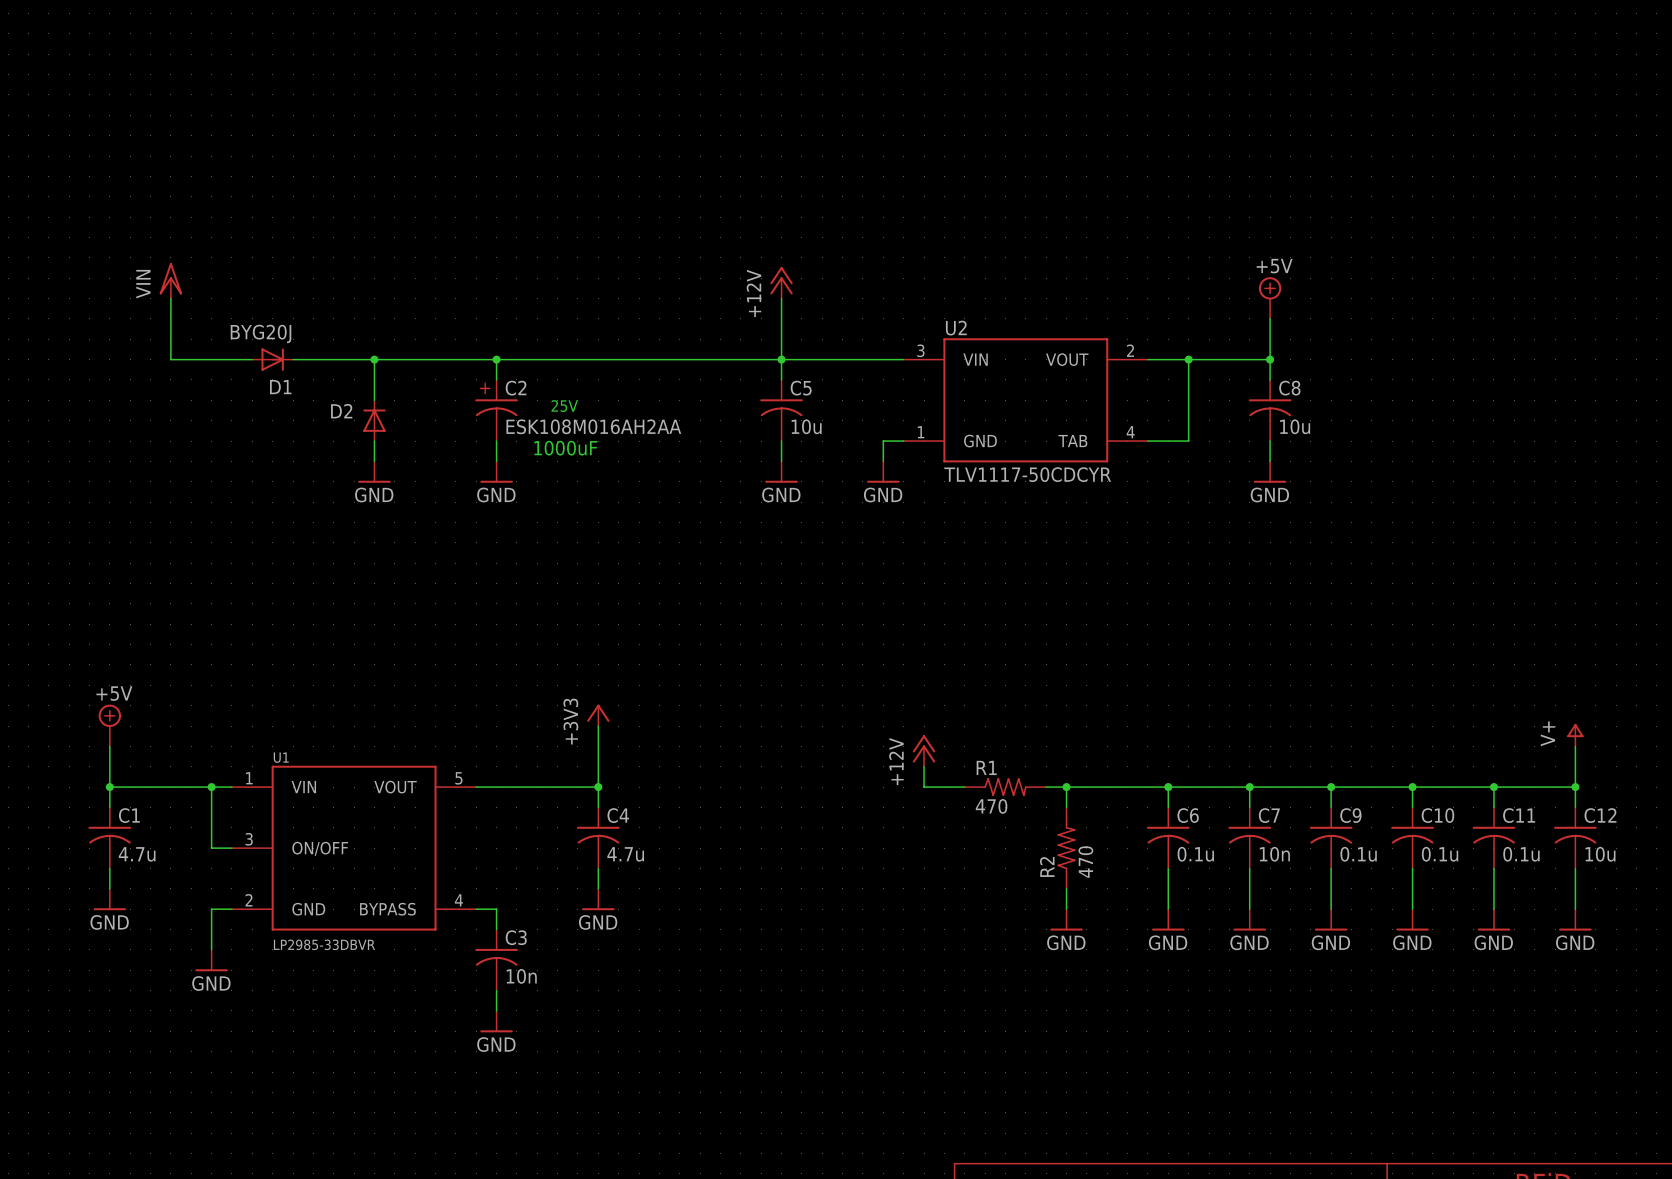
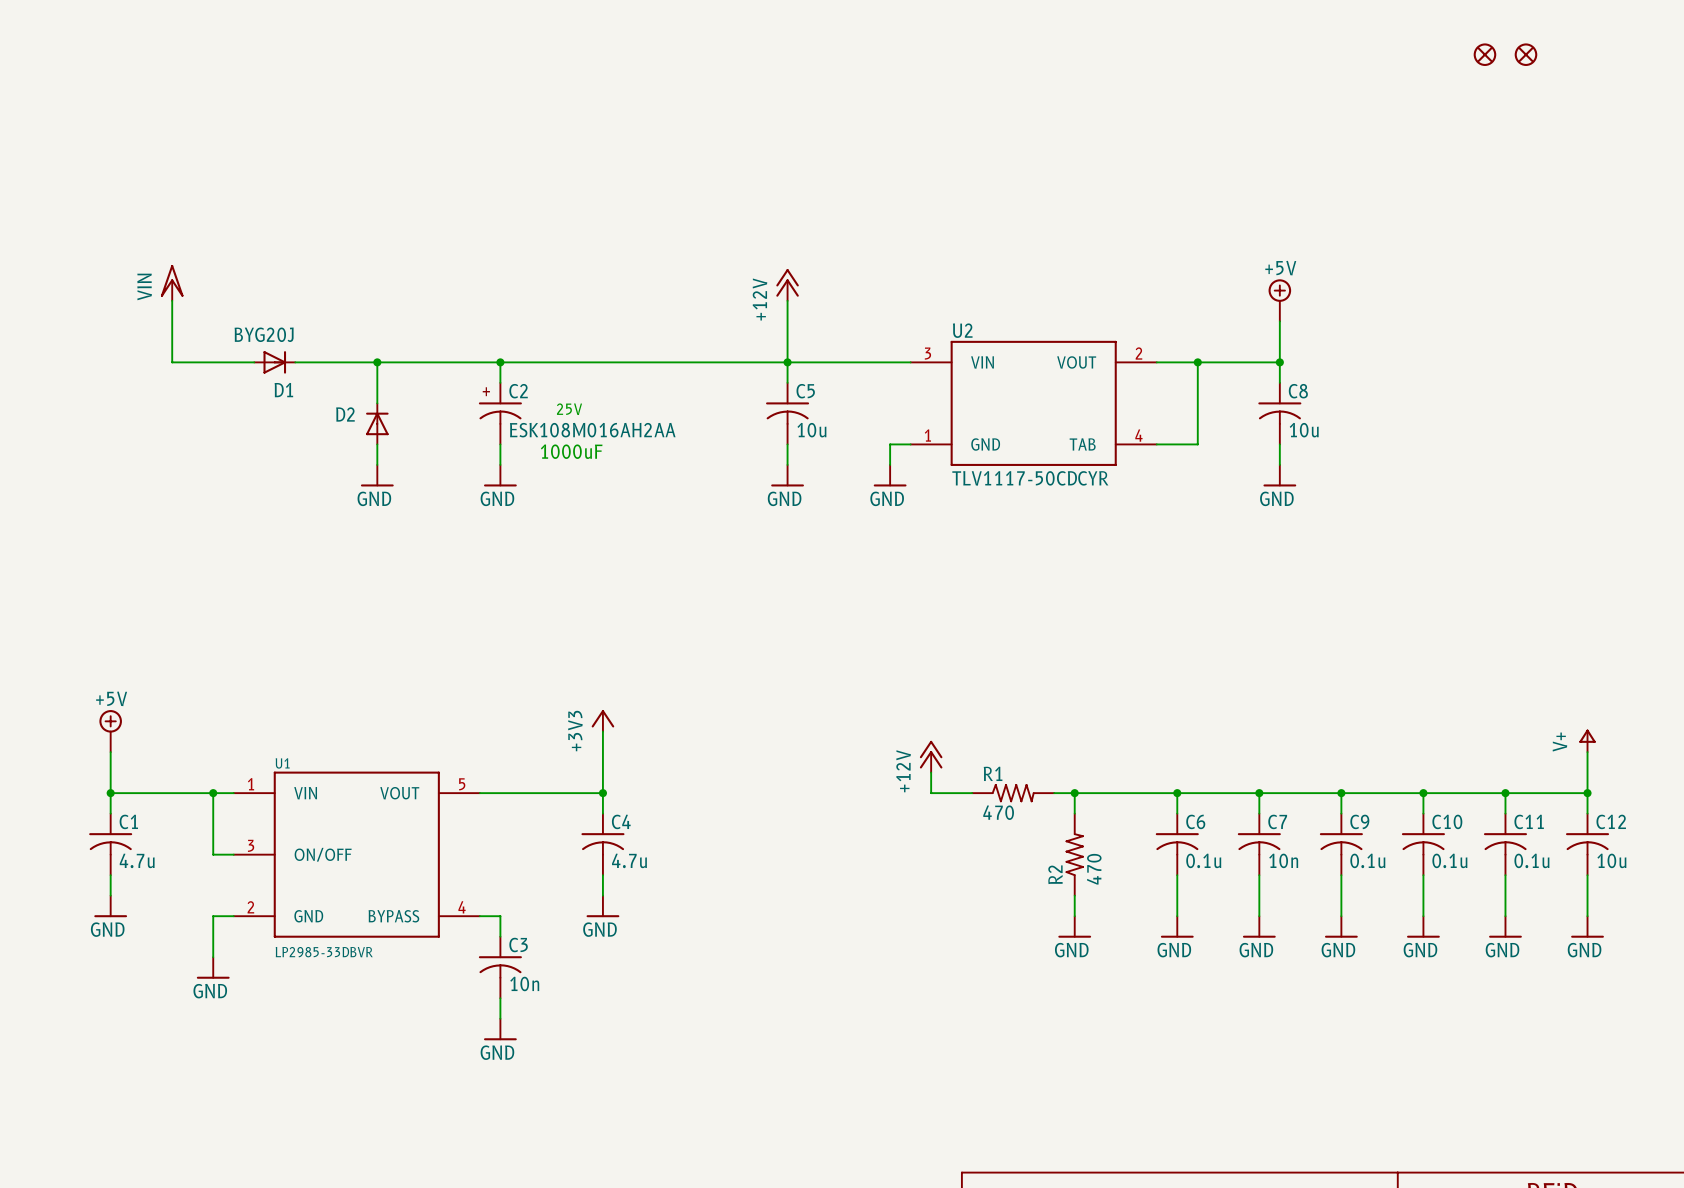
part: none -> (1484, 54)
part: none -> (1525, 54)

